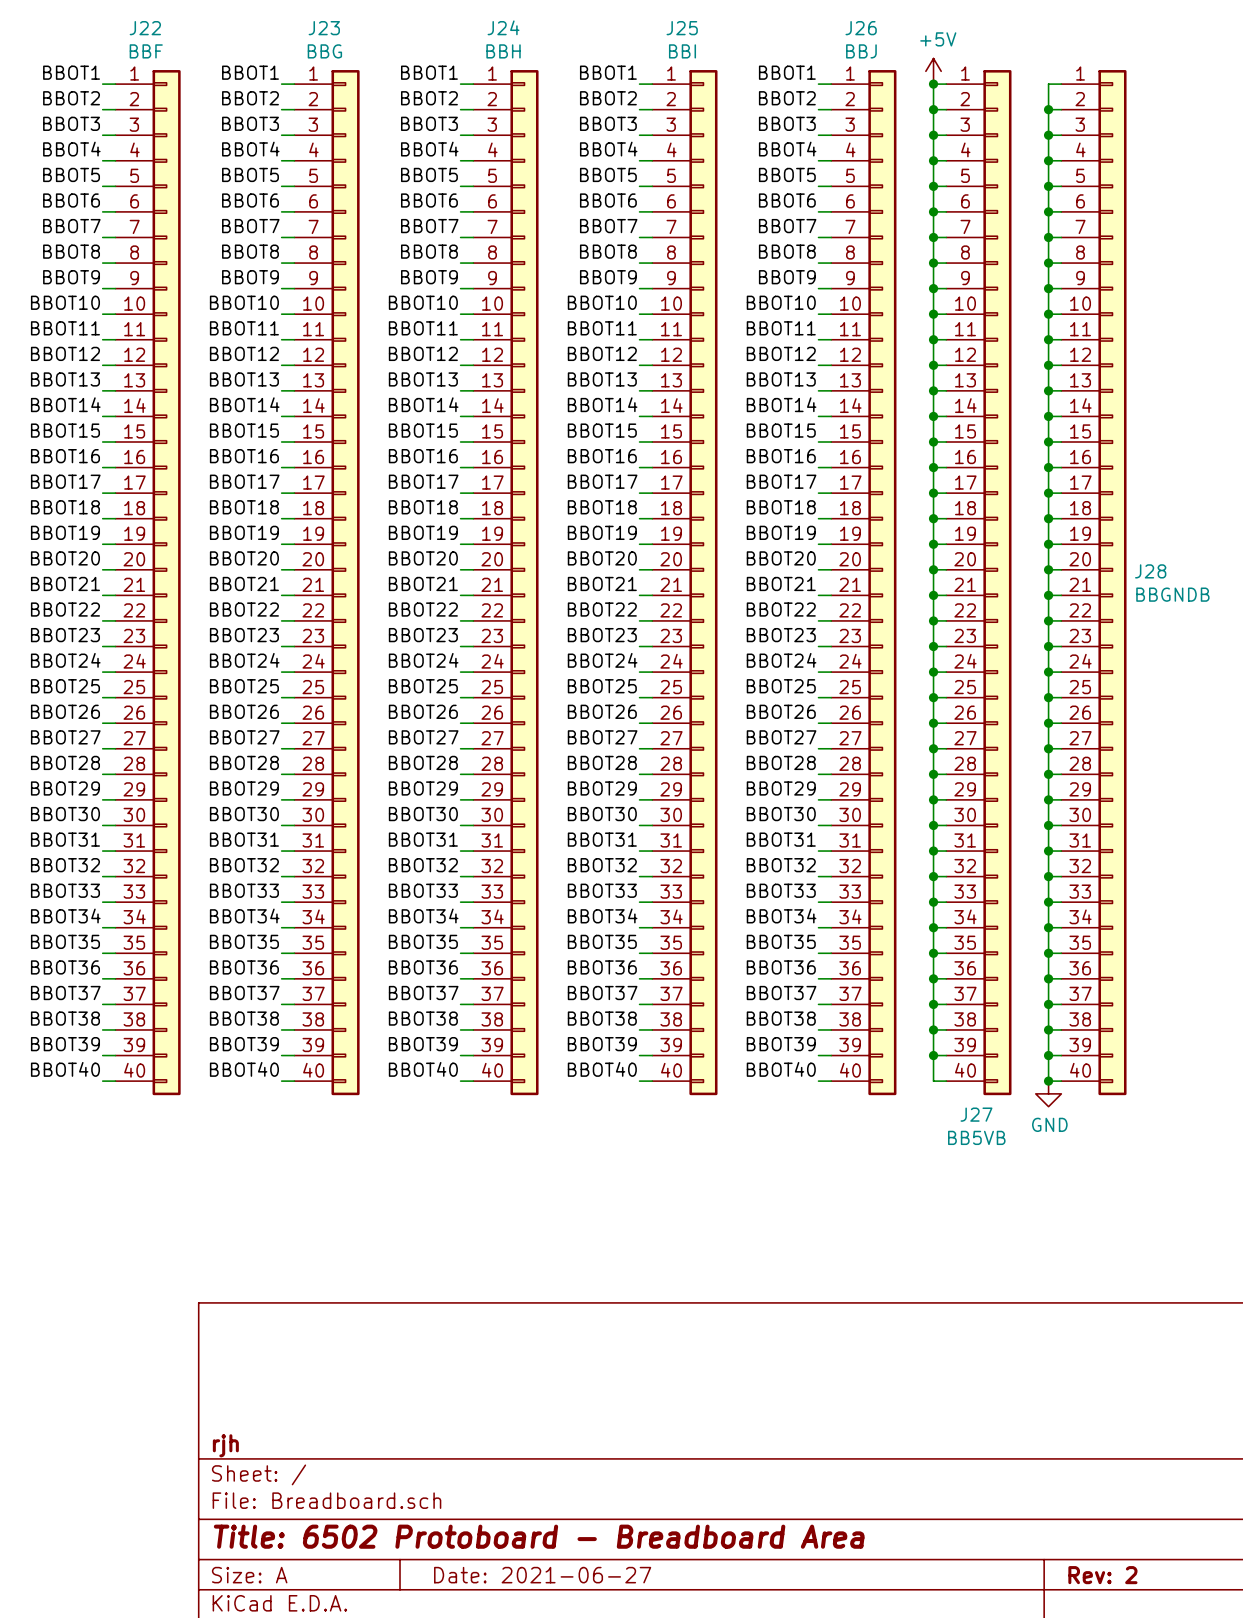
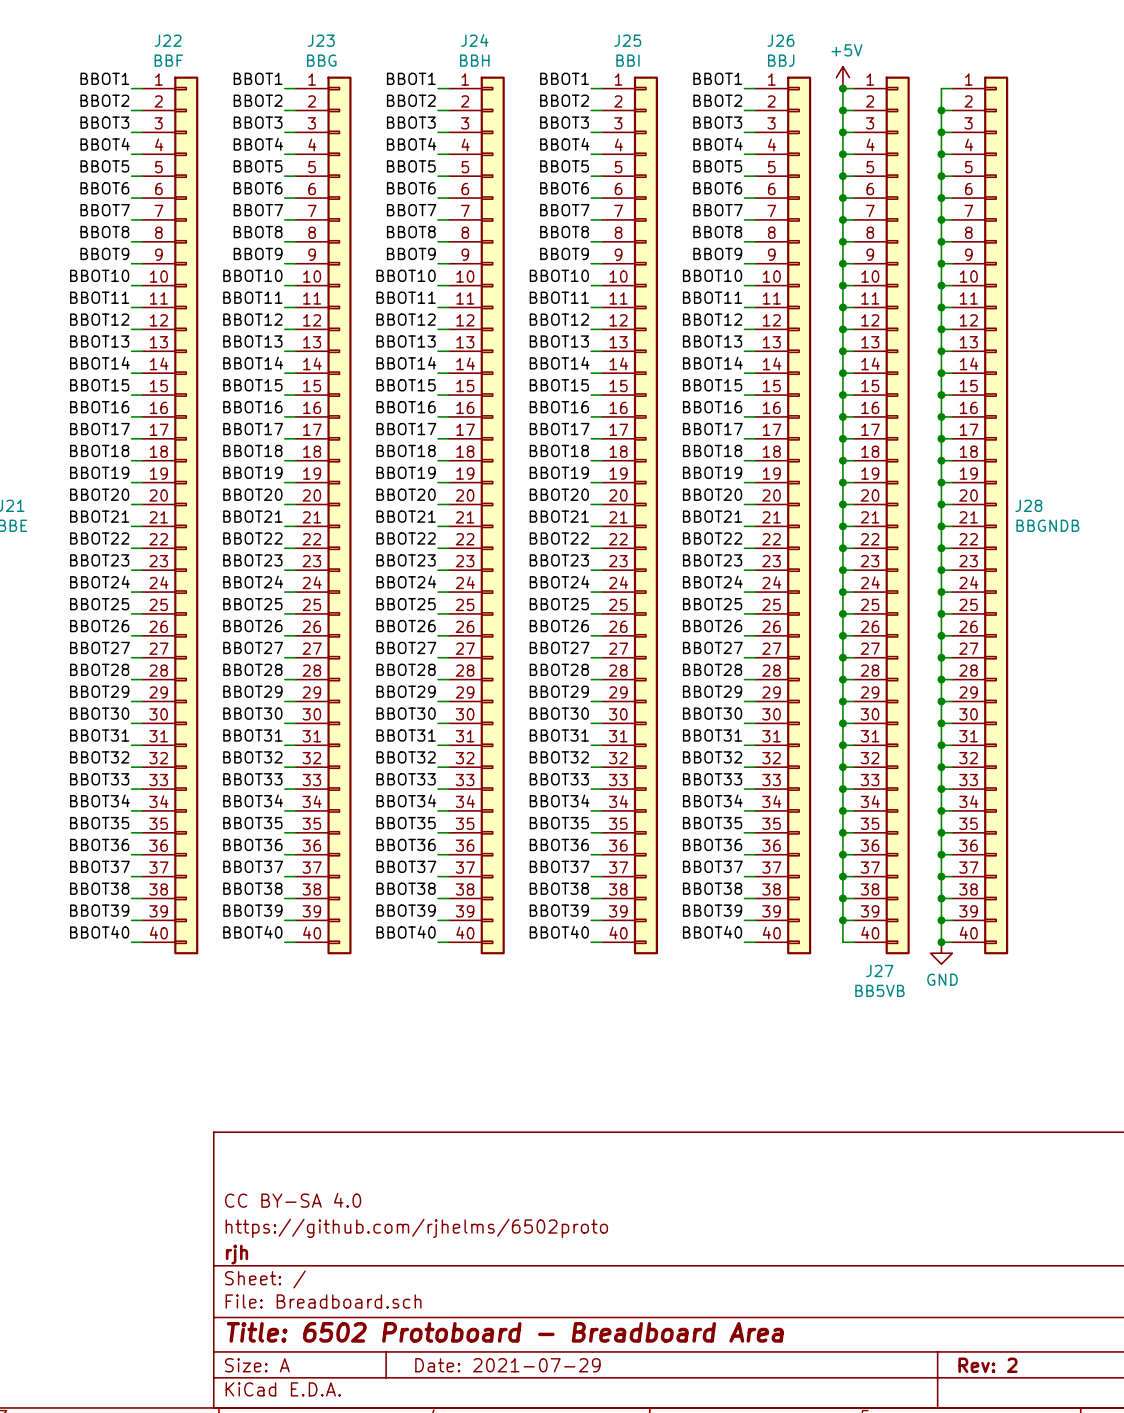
title block: none -> CC BY-SA 4.0 (293, 1200)
title block: none -> https://github.com/rjhelms/6502proto (416, 1228)
title block: Date: 2021-06-27 (542, 1575) -> Date: 2021-07-29 (507, 1365)

